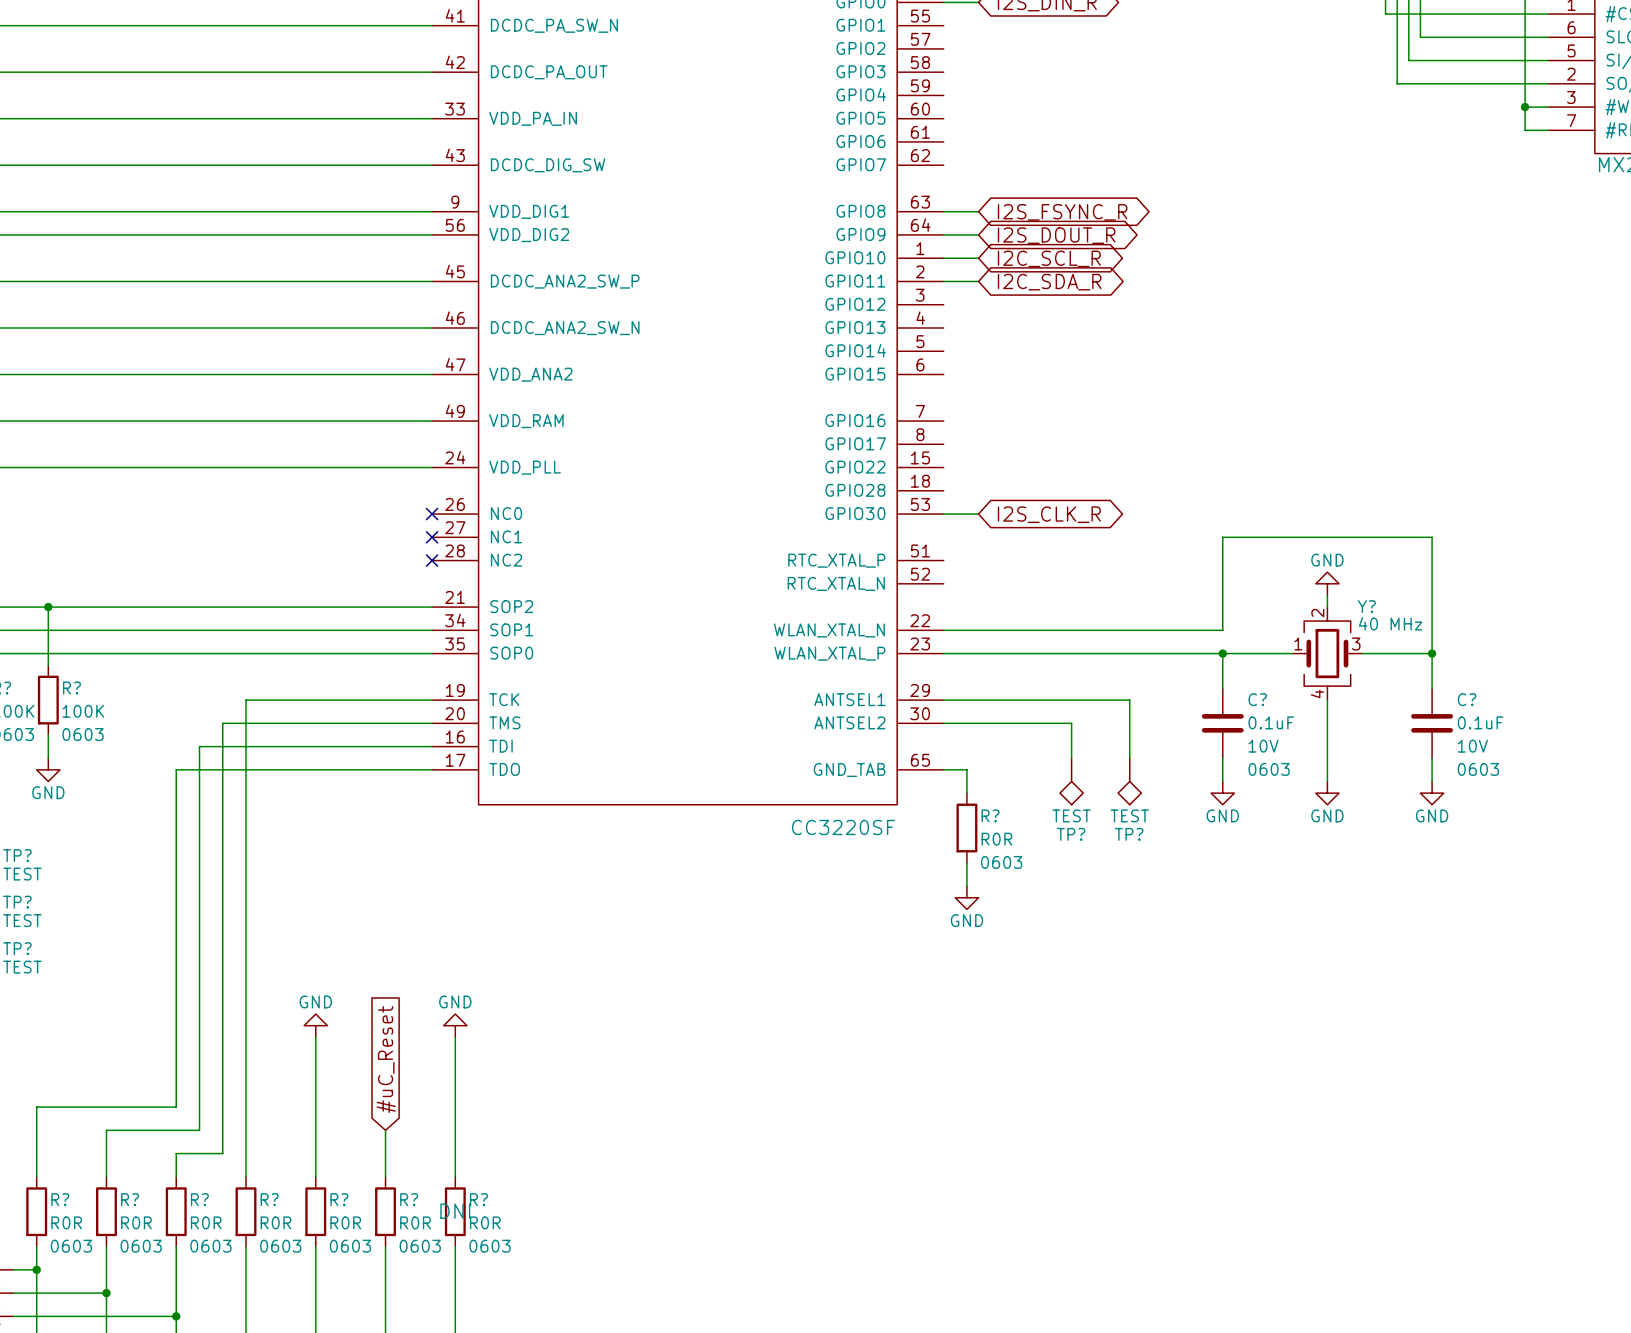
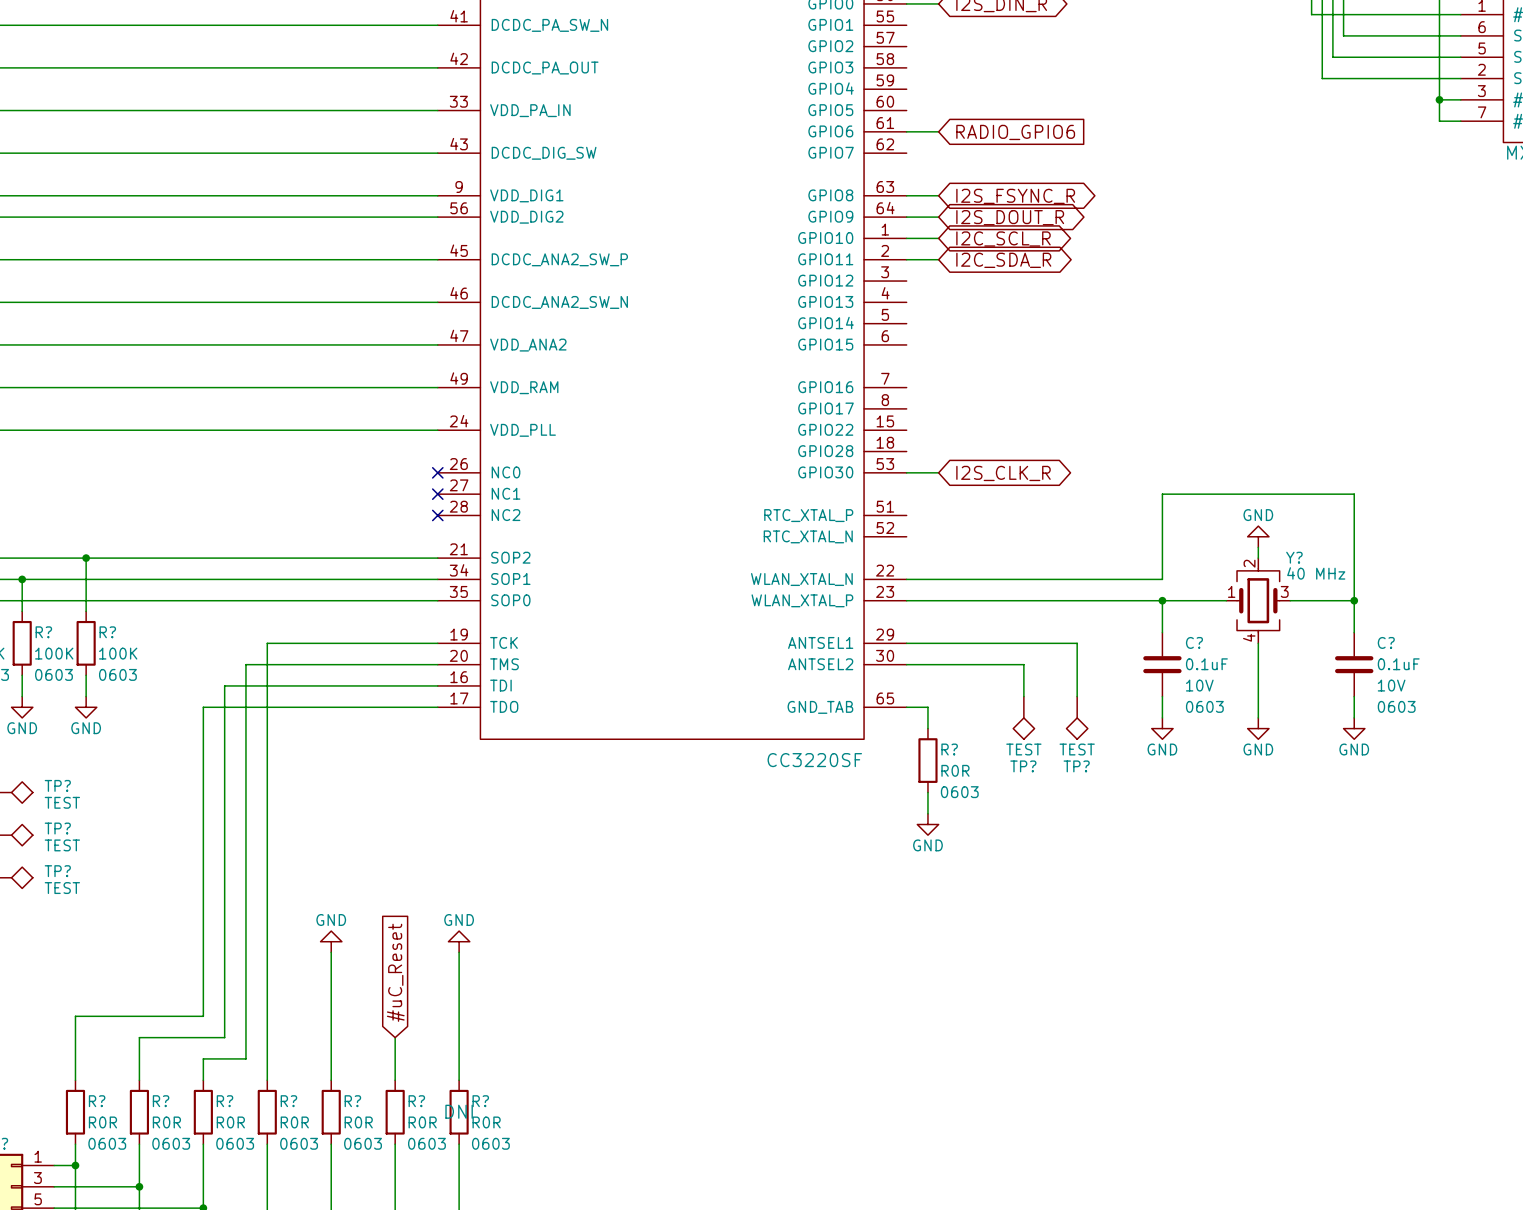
wire: none -> (906, 131) (938, 131)
global label: none -> RADIO_GPIO6 (1015, 132)

